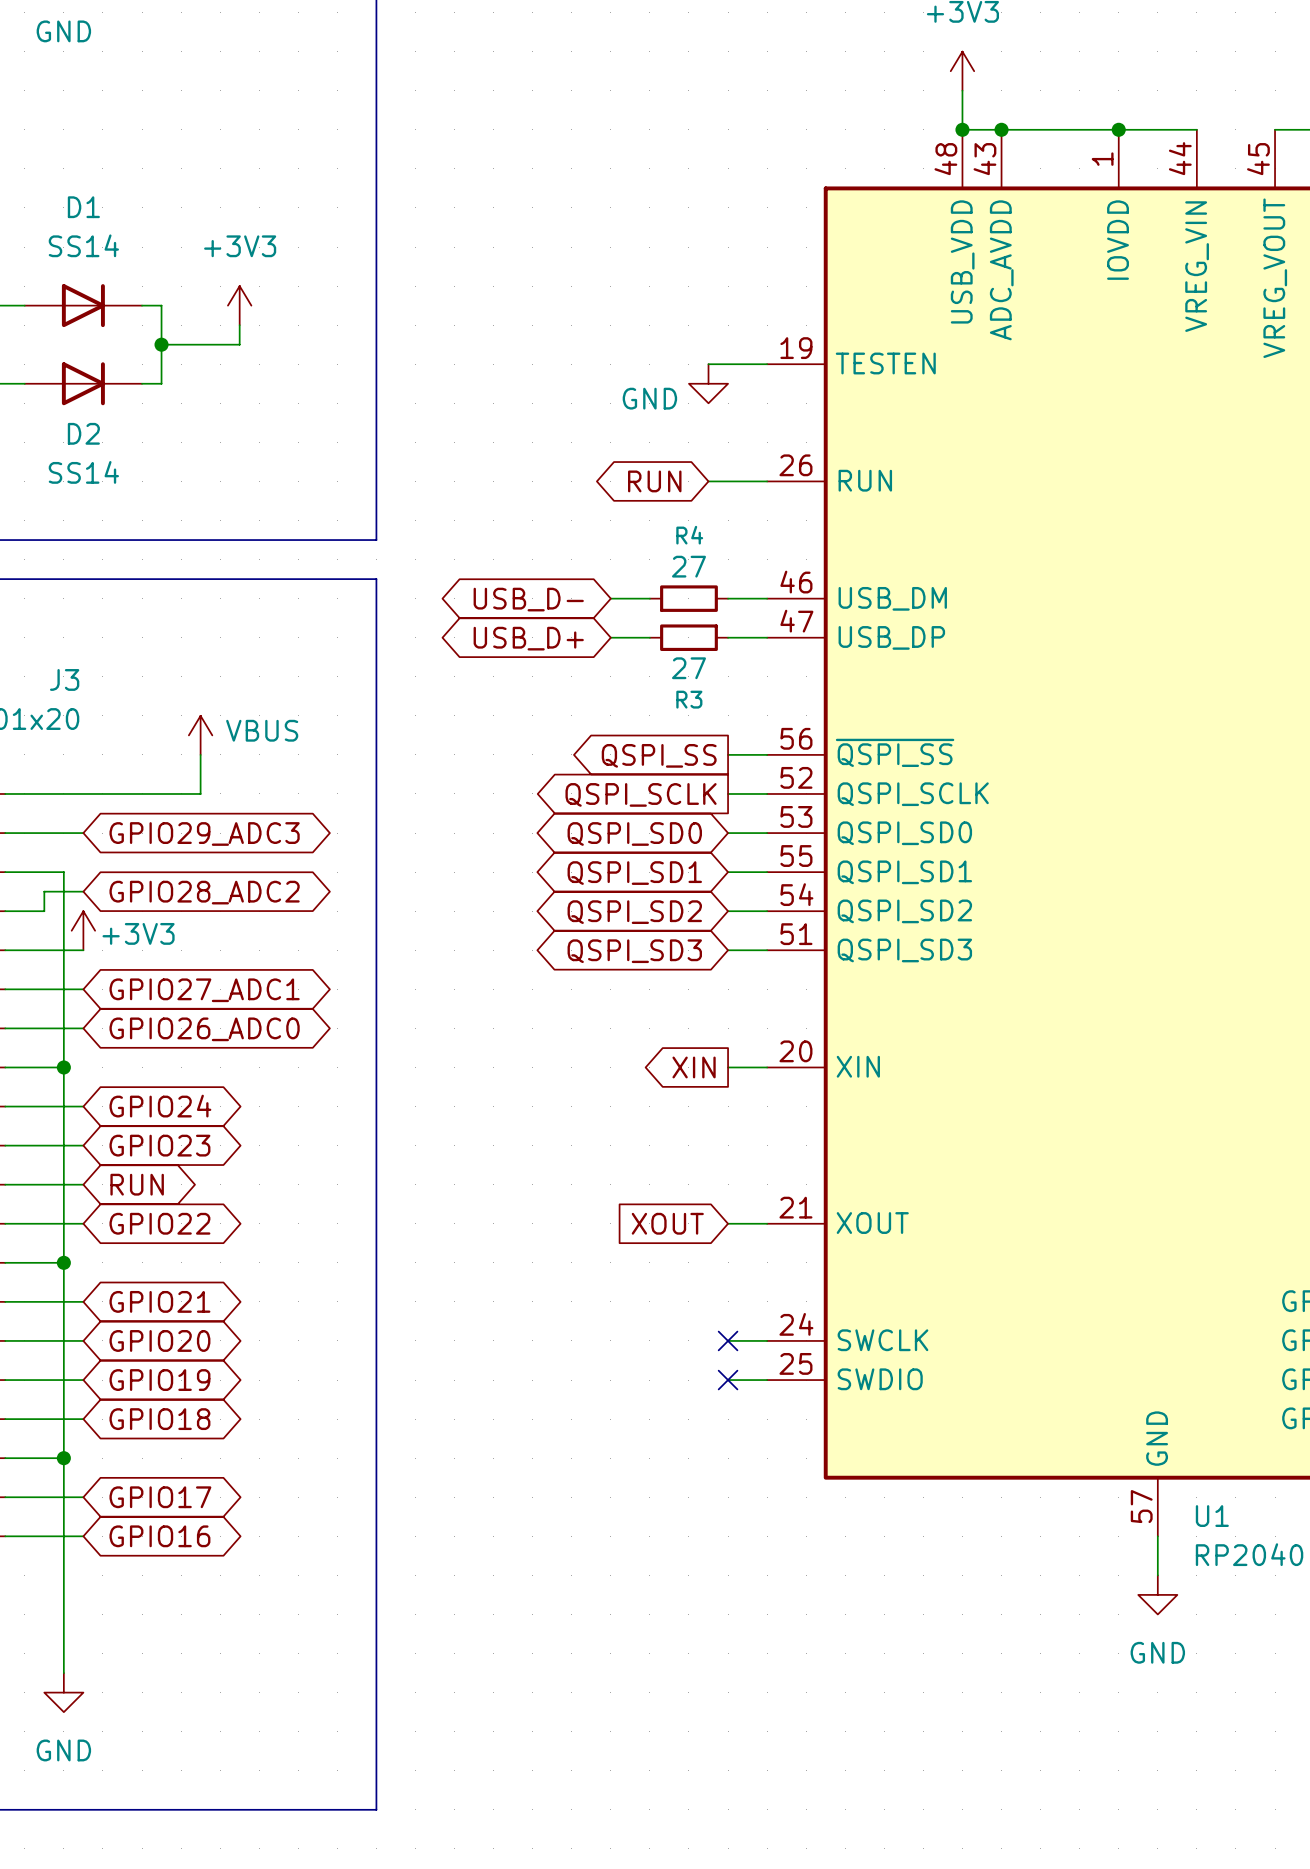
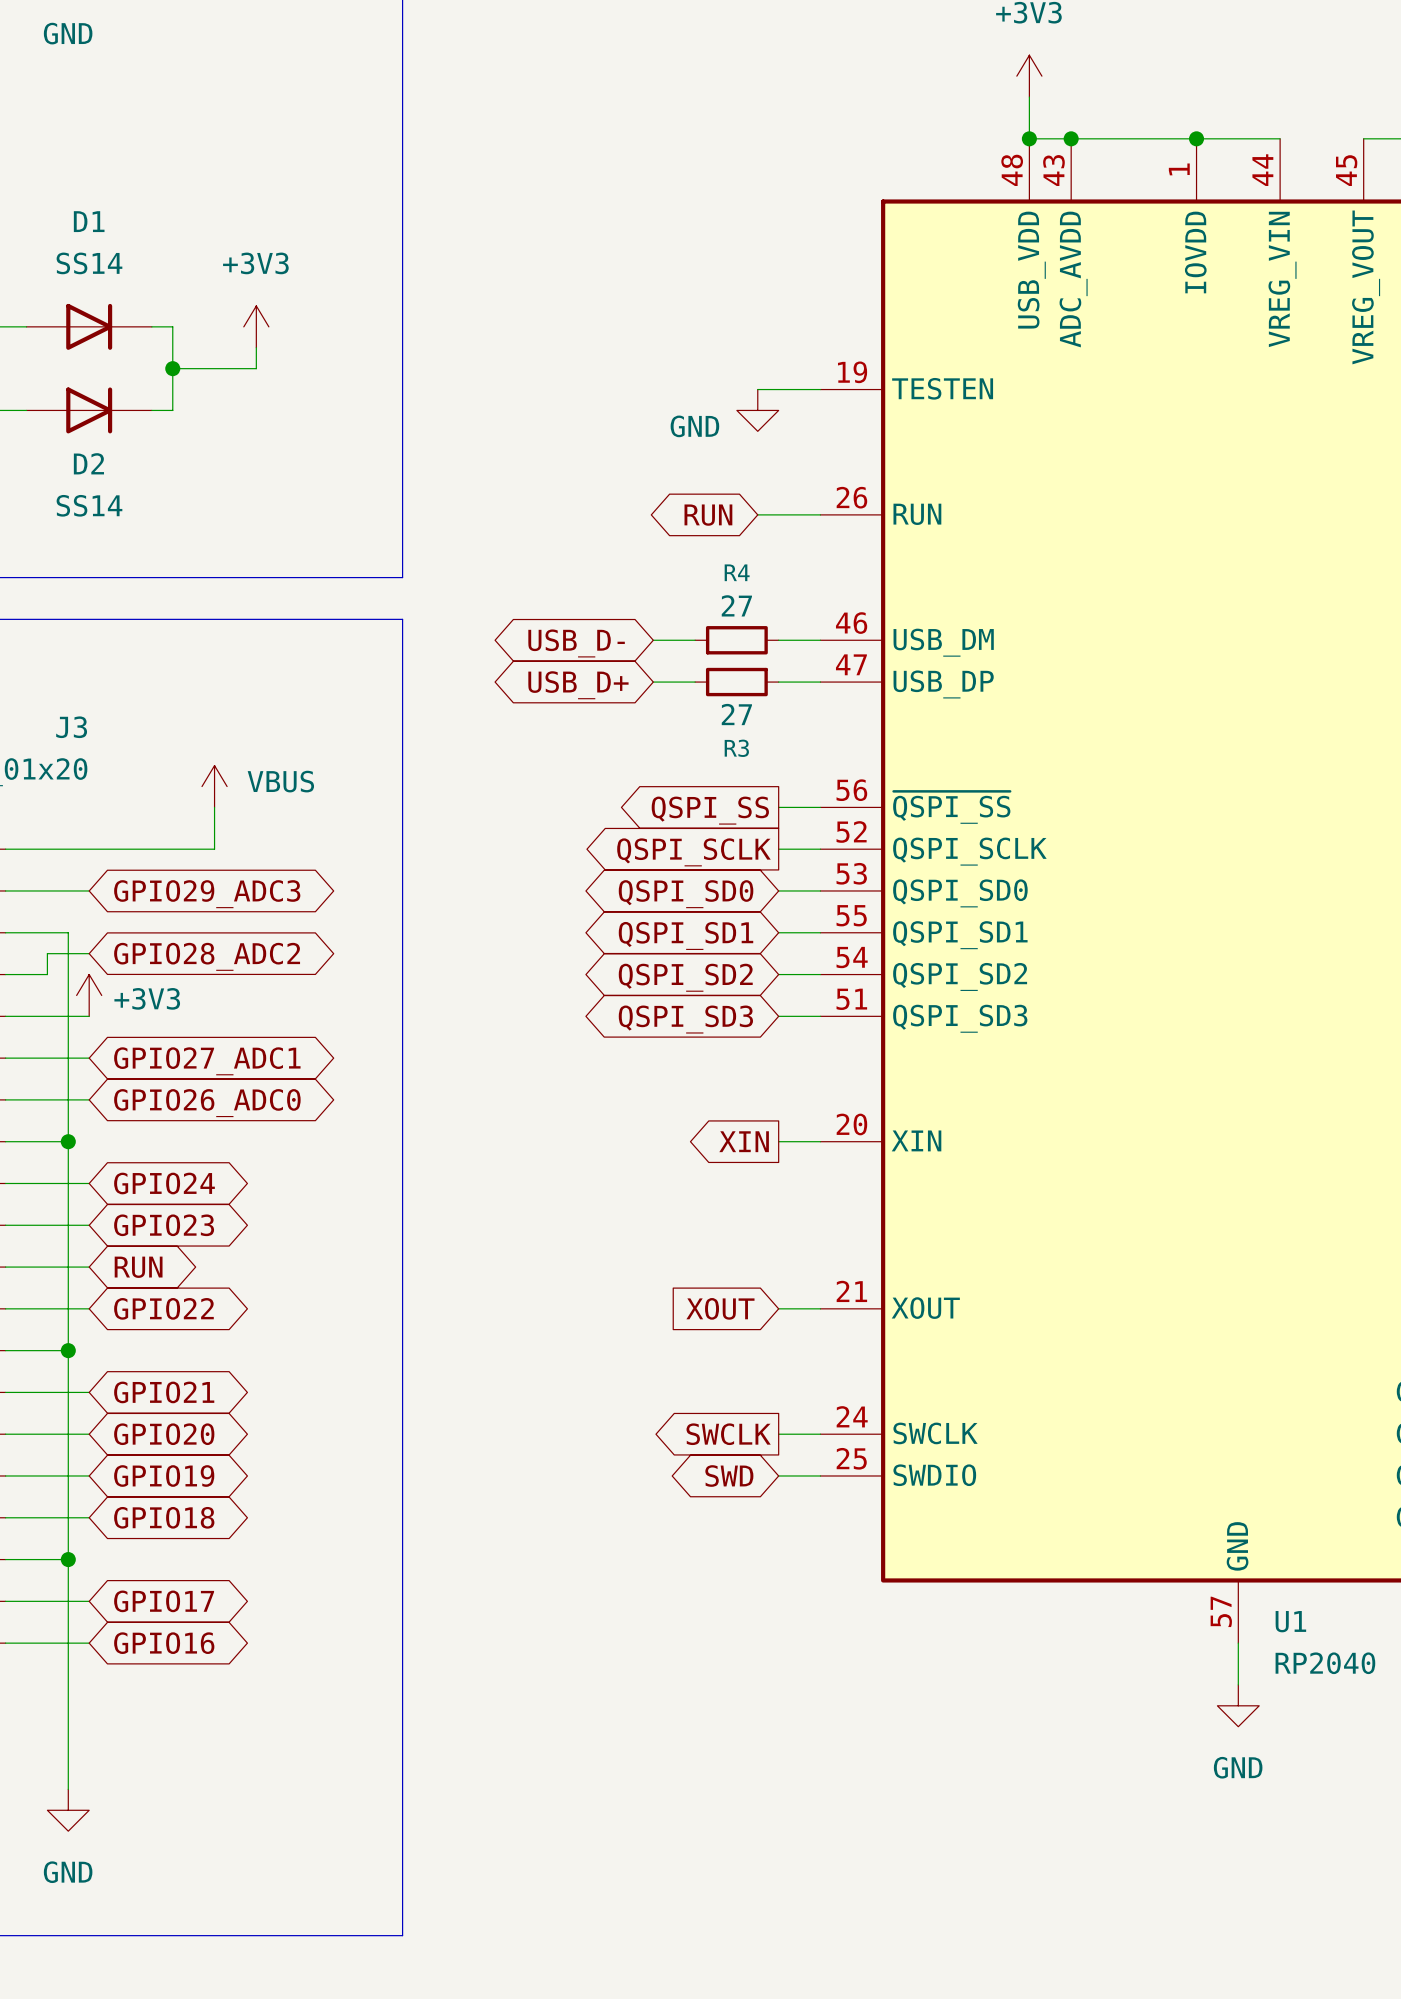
global label: none -> SWCLK (728, 1434)
no-connect mark: (728, 1340) -> none
global label: none -> SWD (729, 1476)
no-connect mark: (728, 1380) -> none

